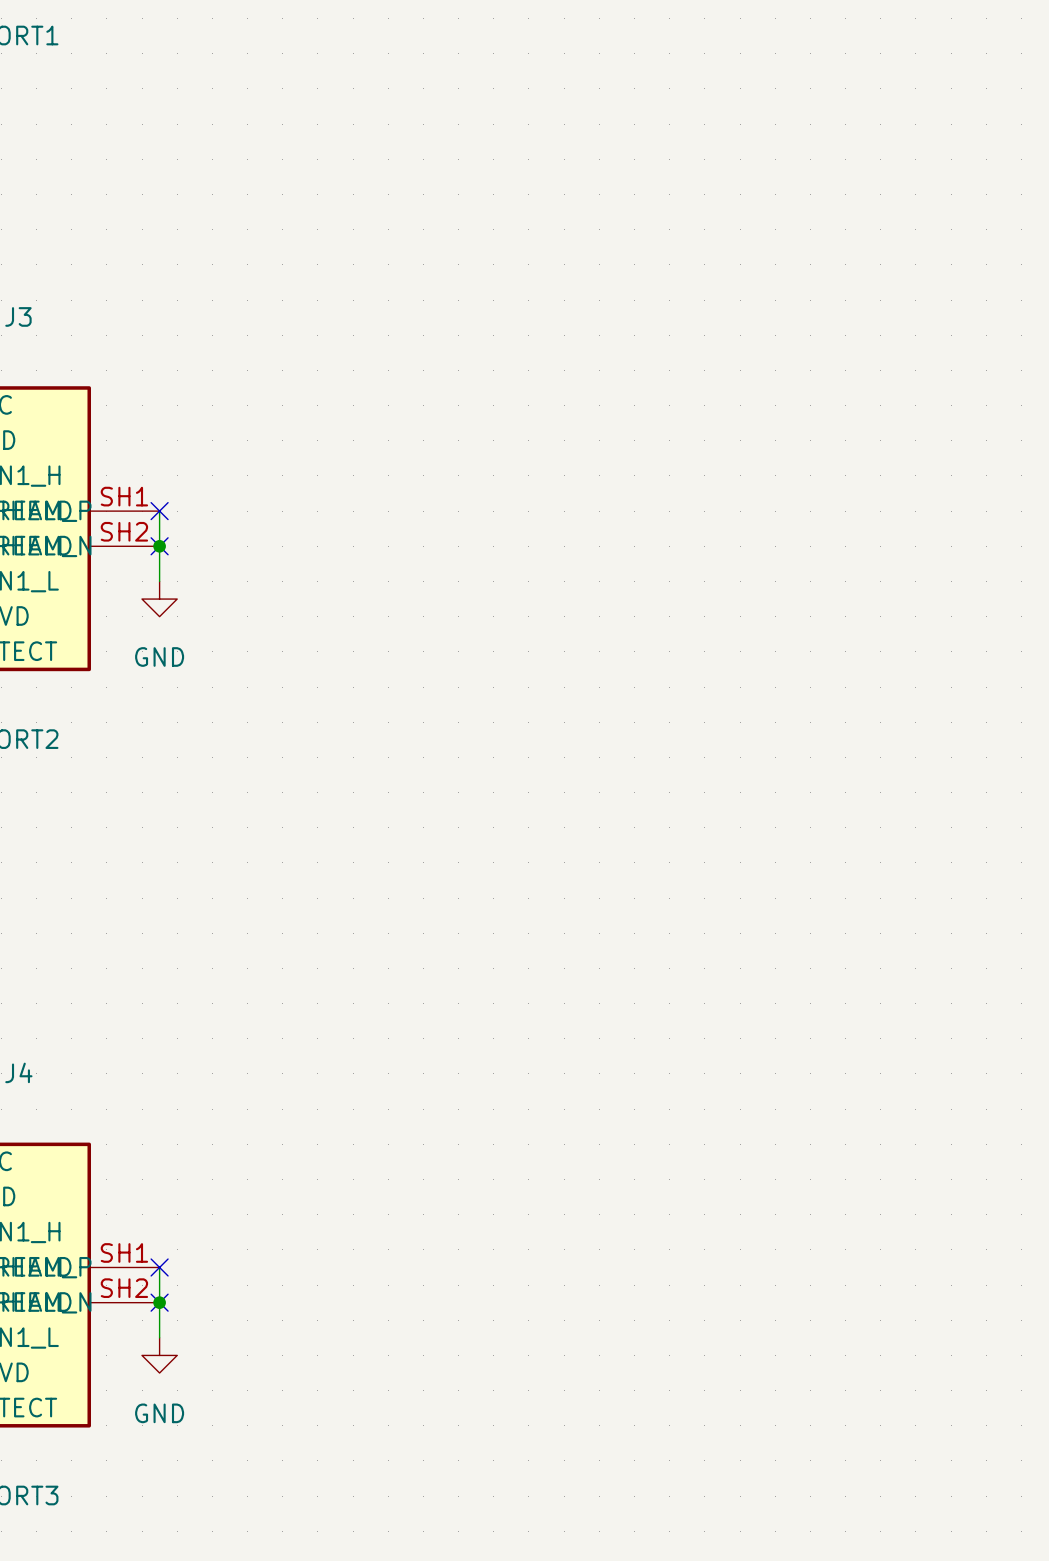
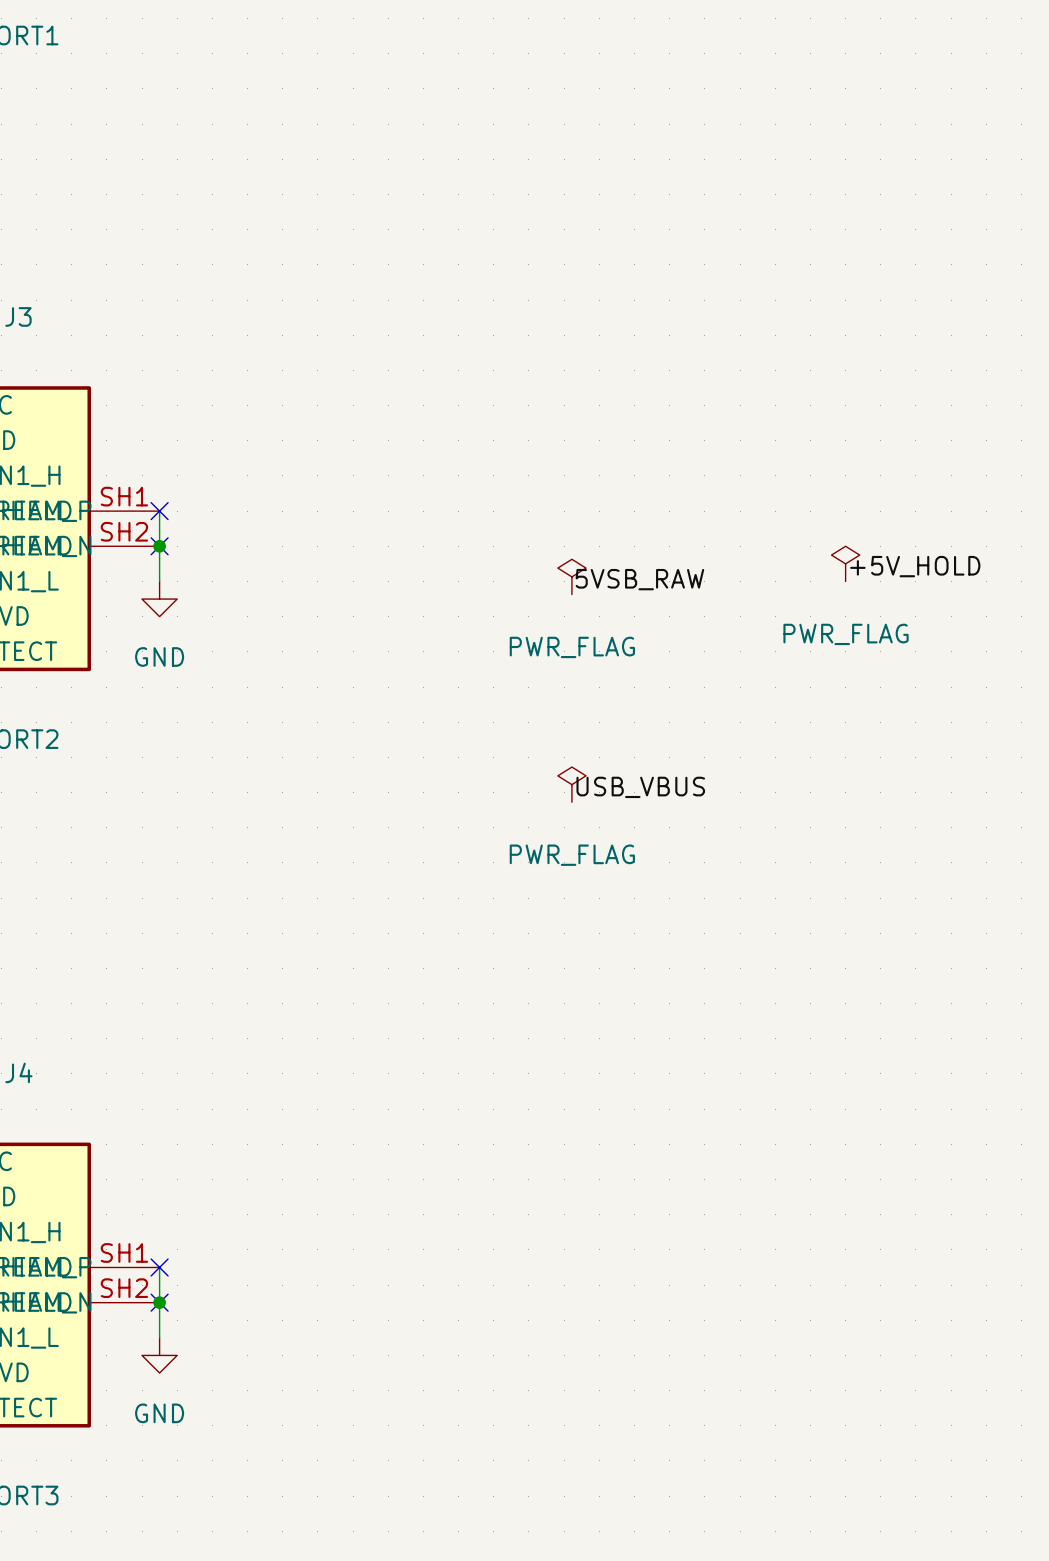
power symbol: none -> PWR_FLAG (845, 563)
label: none -> +5V_HOLD (915, 566)
power symbol: none -> PWR_FLAG (571, 576)
label: none -> 5VSB_RAW (639, 579)
power symbol: none -> PWR_FLAG (571, 784)
label: none -> USB_VBUS (640, 787)

